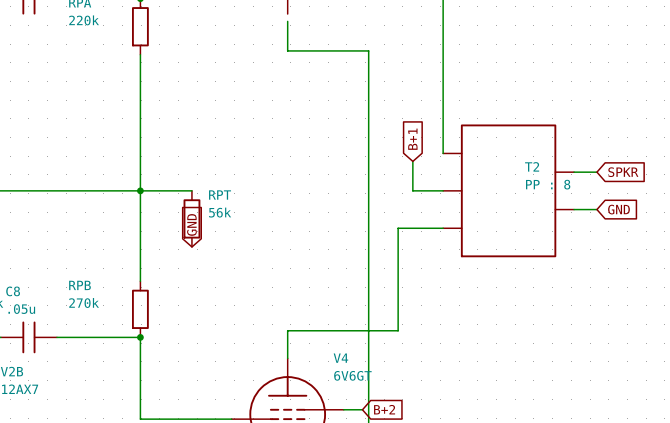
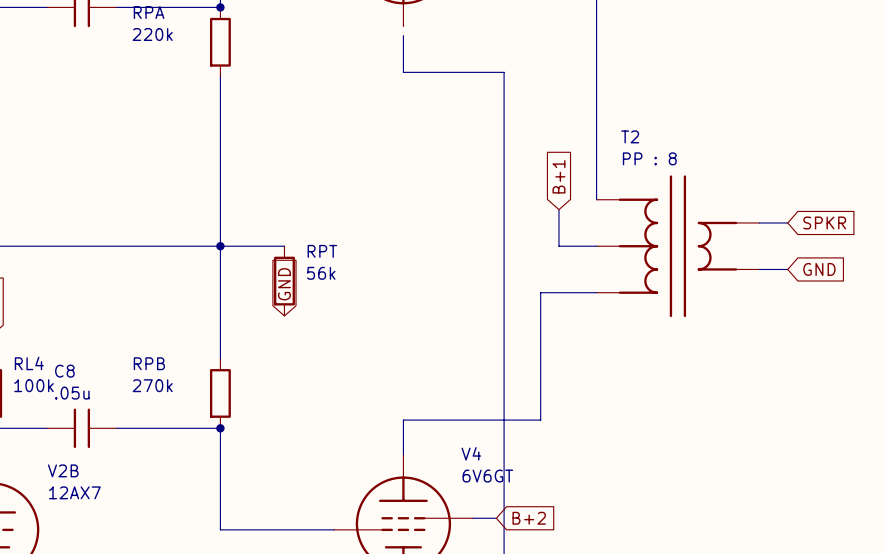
T2 symbol: [443, 124, 575, 258] -> [596, 175, 760, 318]
T2 name position: T2 (532, 166) -> T2 (630, 136)
T2 value position: PP : 8 (548, 184) -> PP : 8 (649, 158)

